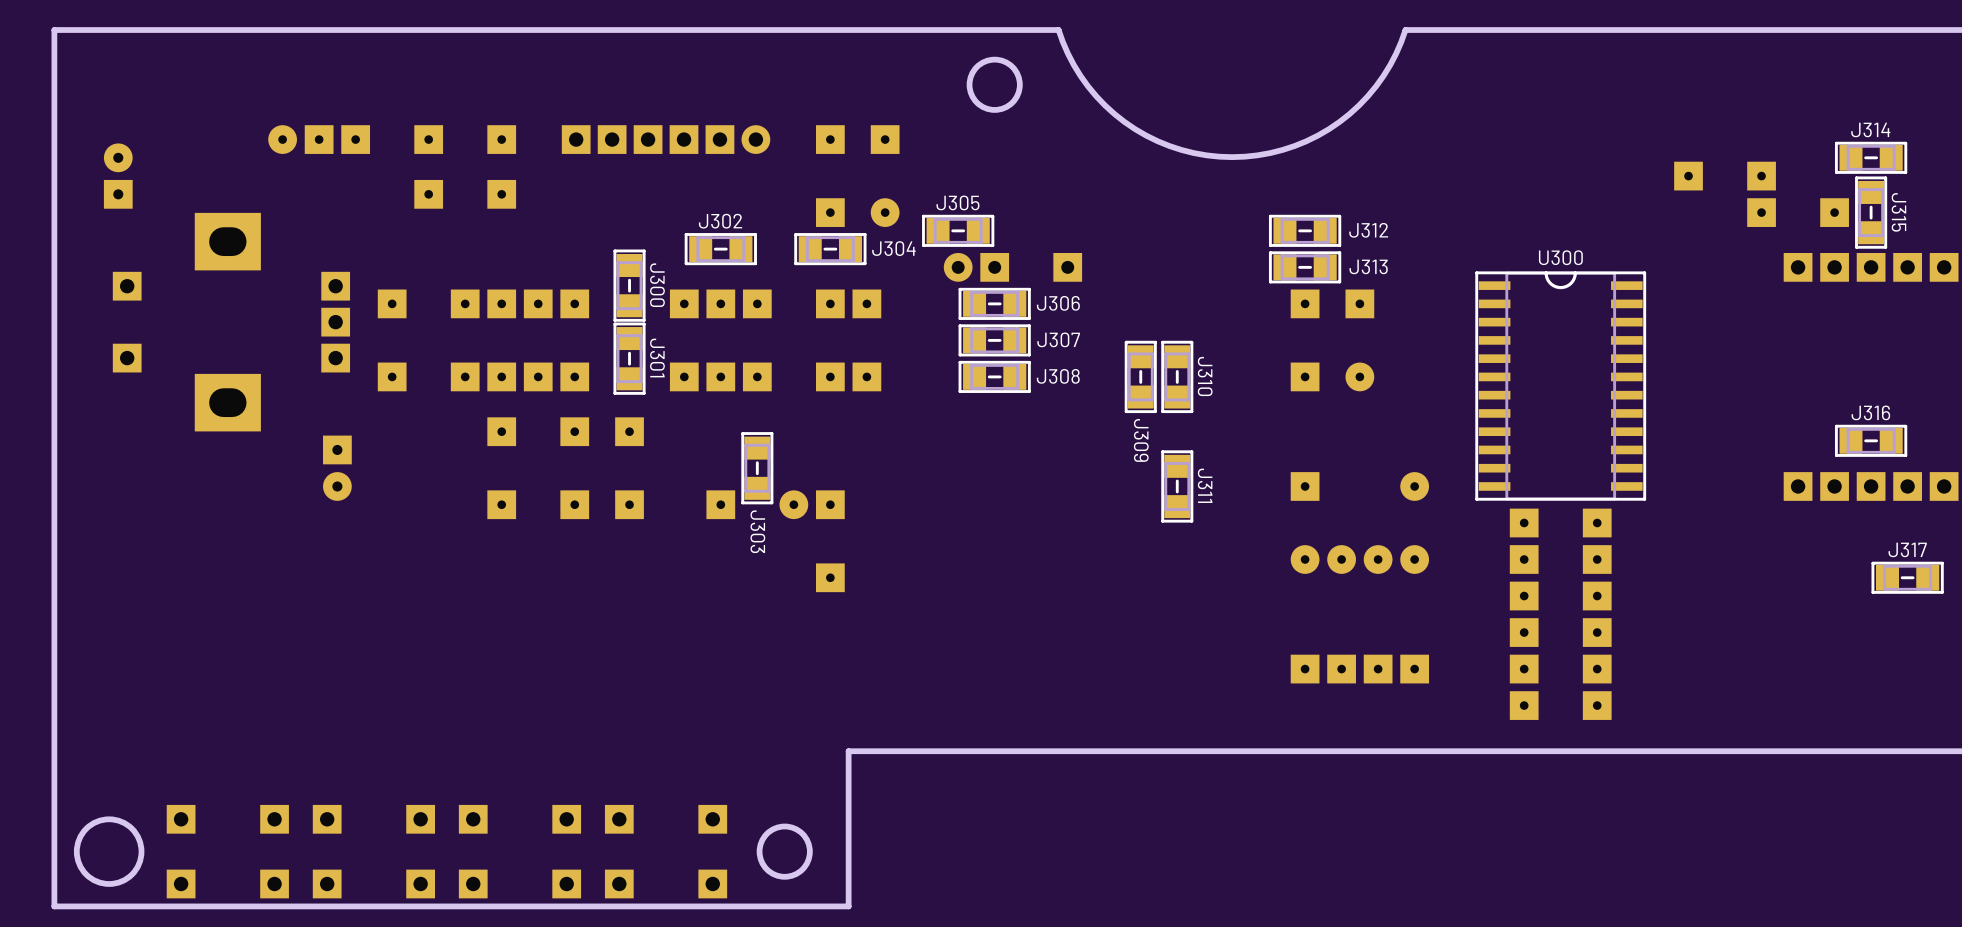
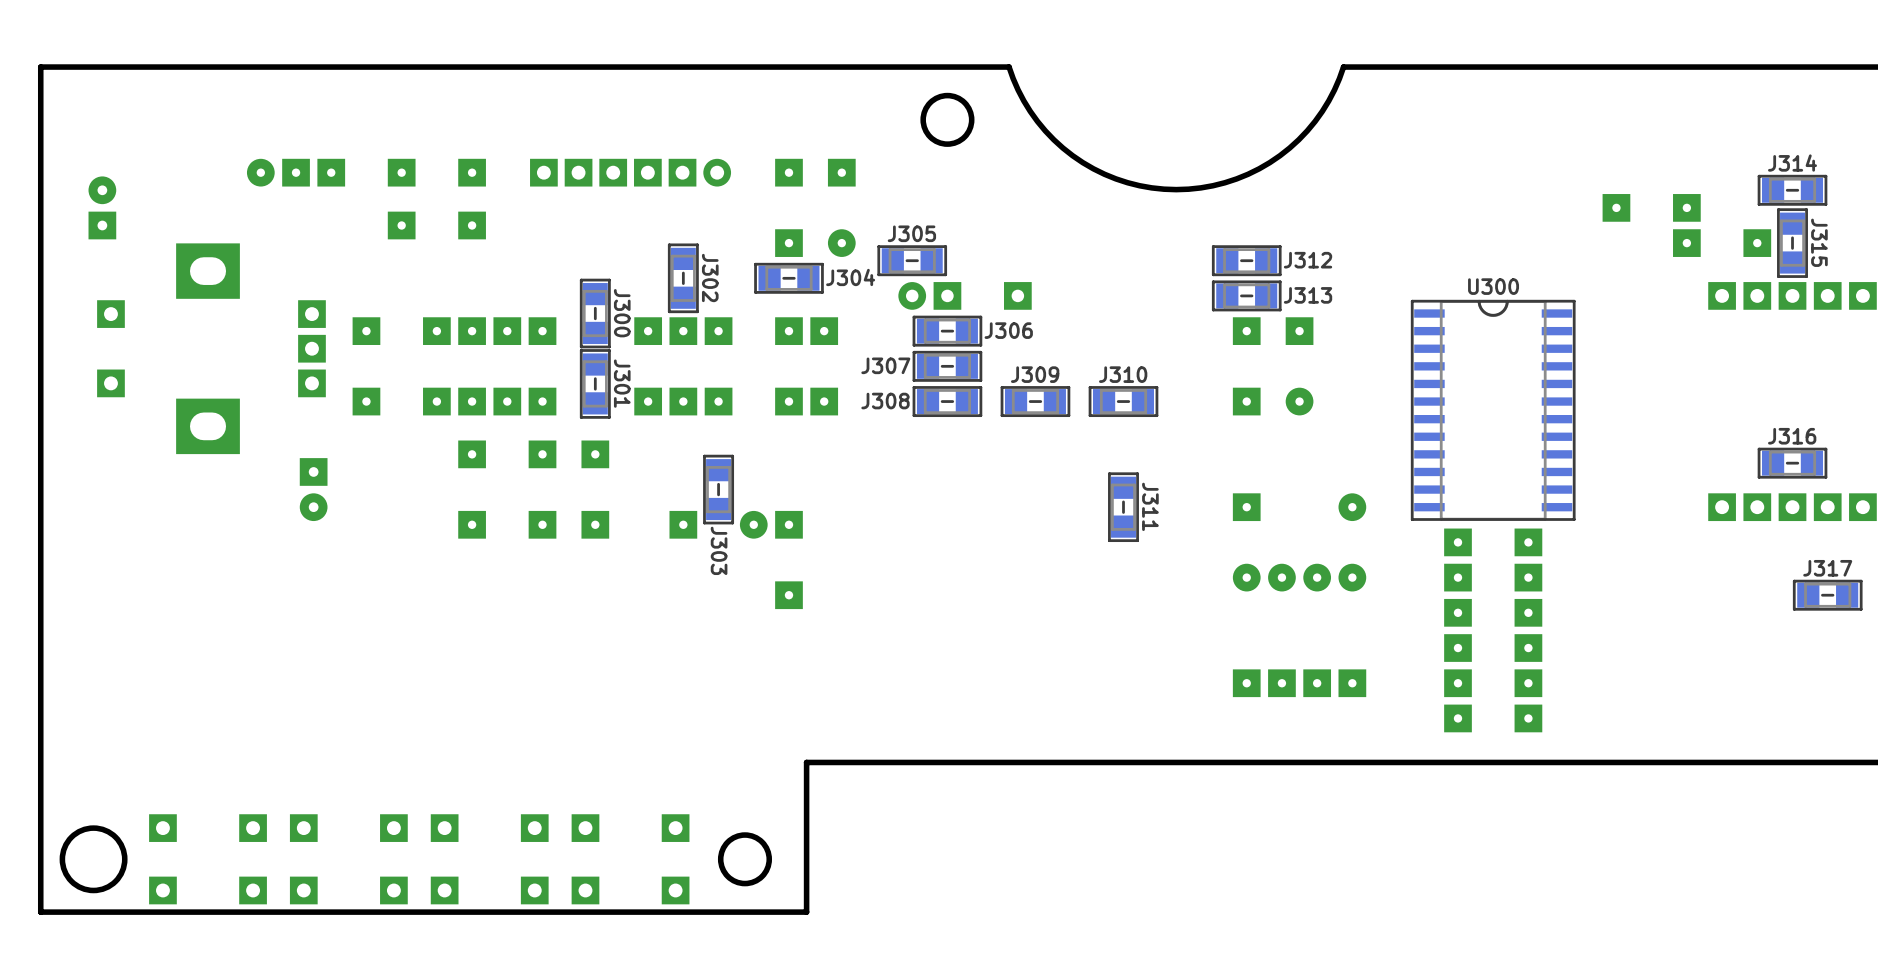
J302 rotation: 0° (720, 249) -> 90° clockwise (683, 278)
J307 name position: J307 (1058, 339) -> J307 (885, 365)
J308 name position: J308 (1058, 376) -> J308 (885, 401)
J309 rotation: 0° (1140, 376) -> 90° clockwise (1035, 401)
J309 position: (1140, 376) -> (1035, 401)
J310 rotation: 0° (1177, 376) -> 90° clockwise (1123, 401)
J310 name position: J310 (1205, 376) -> J310 (1123, 374)
J309 name position: J309 (1141, 440) -> J309 (1035, 374)

